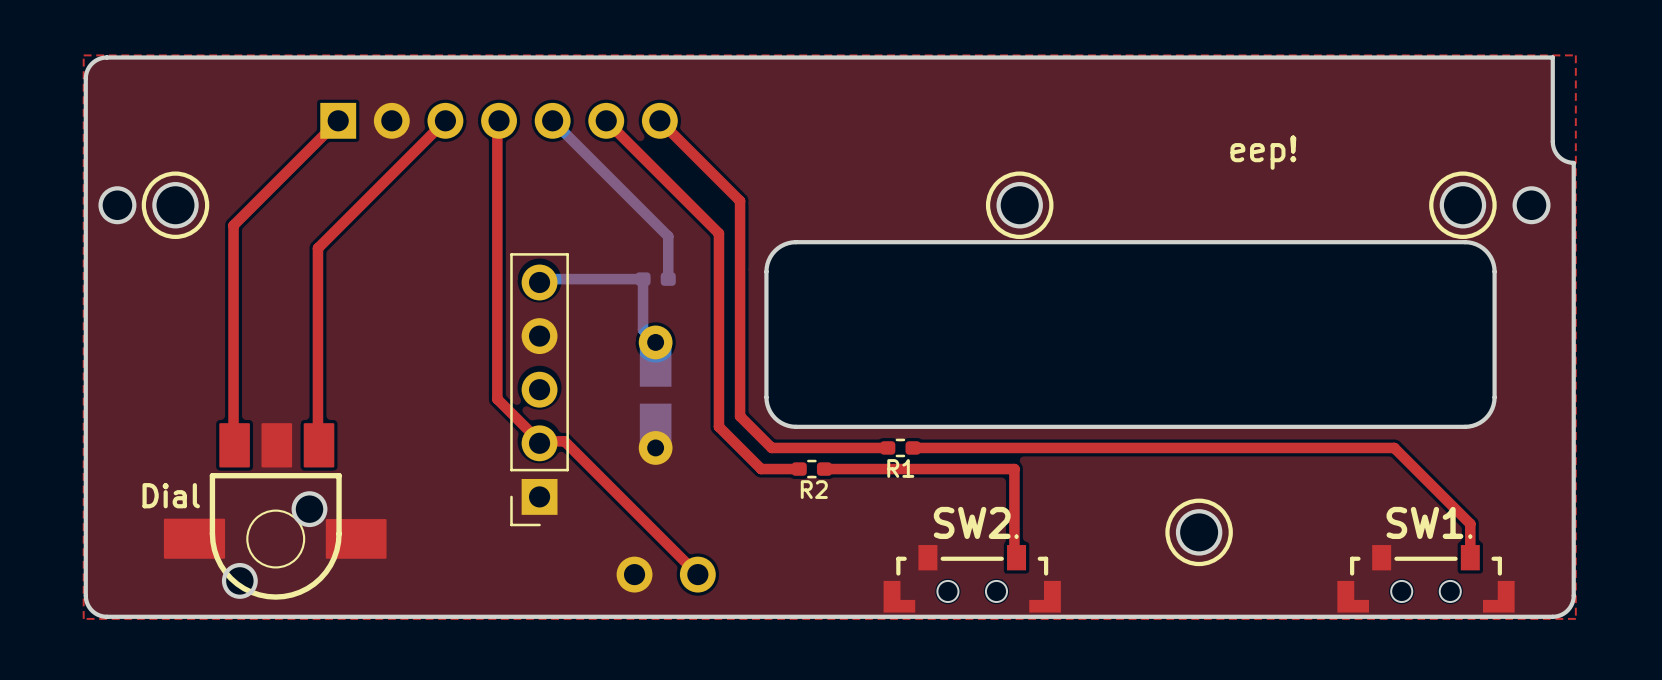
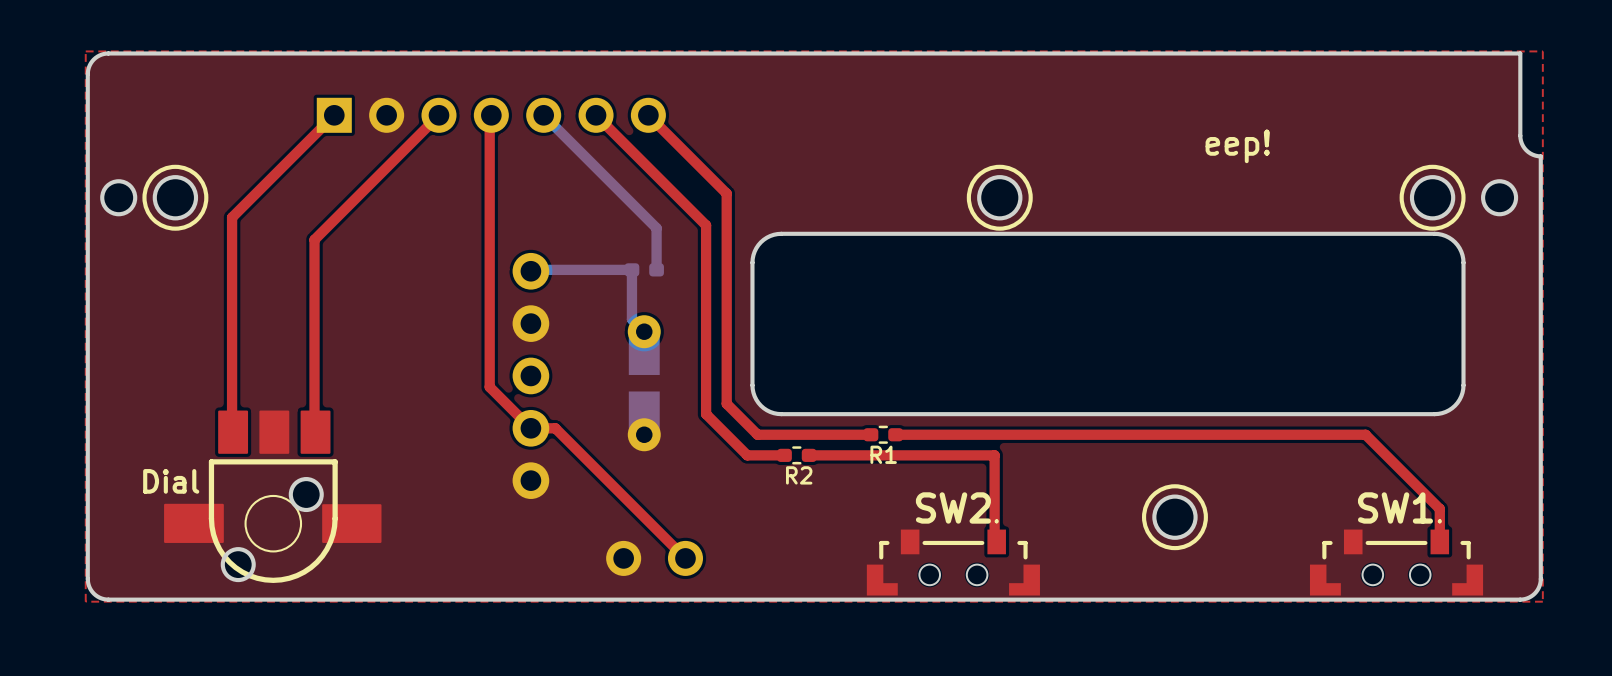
part footprint: [510, 253, 569, 527] -> [512, 252, 550, 499]

